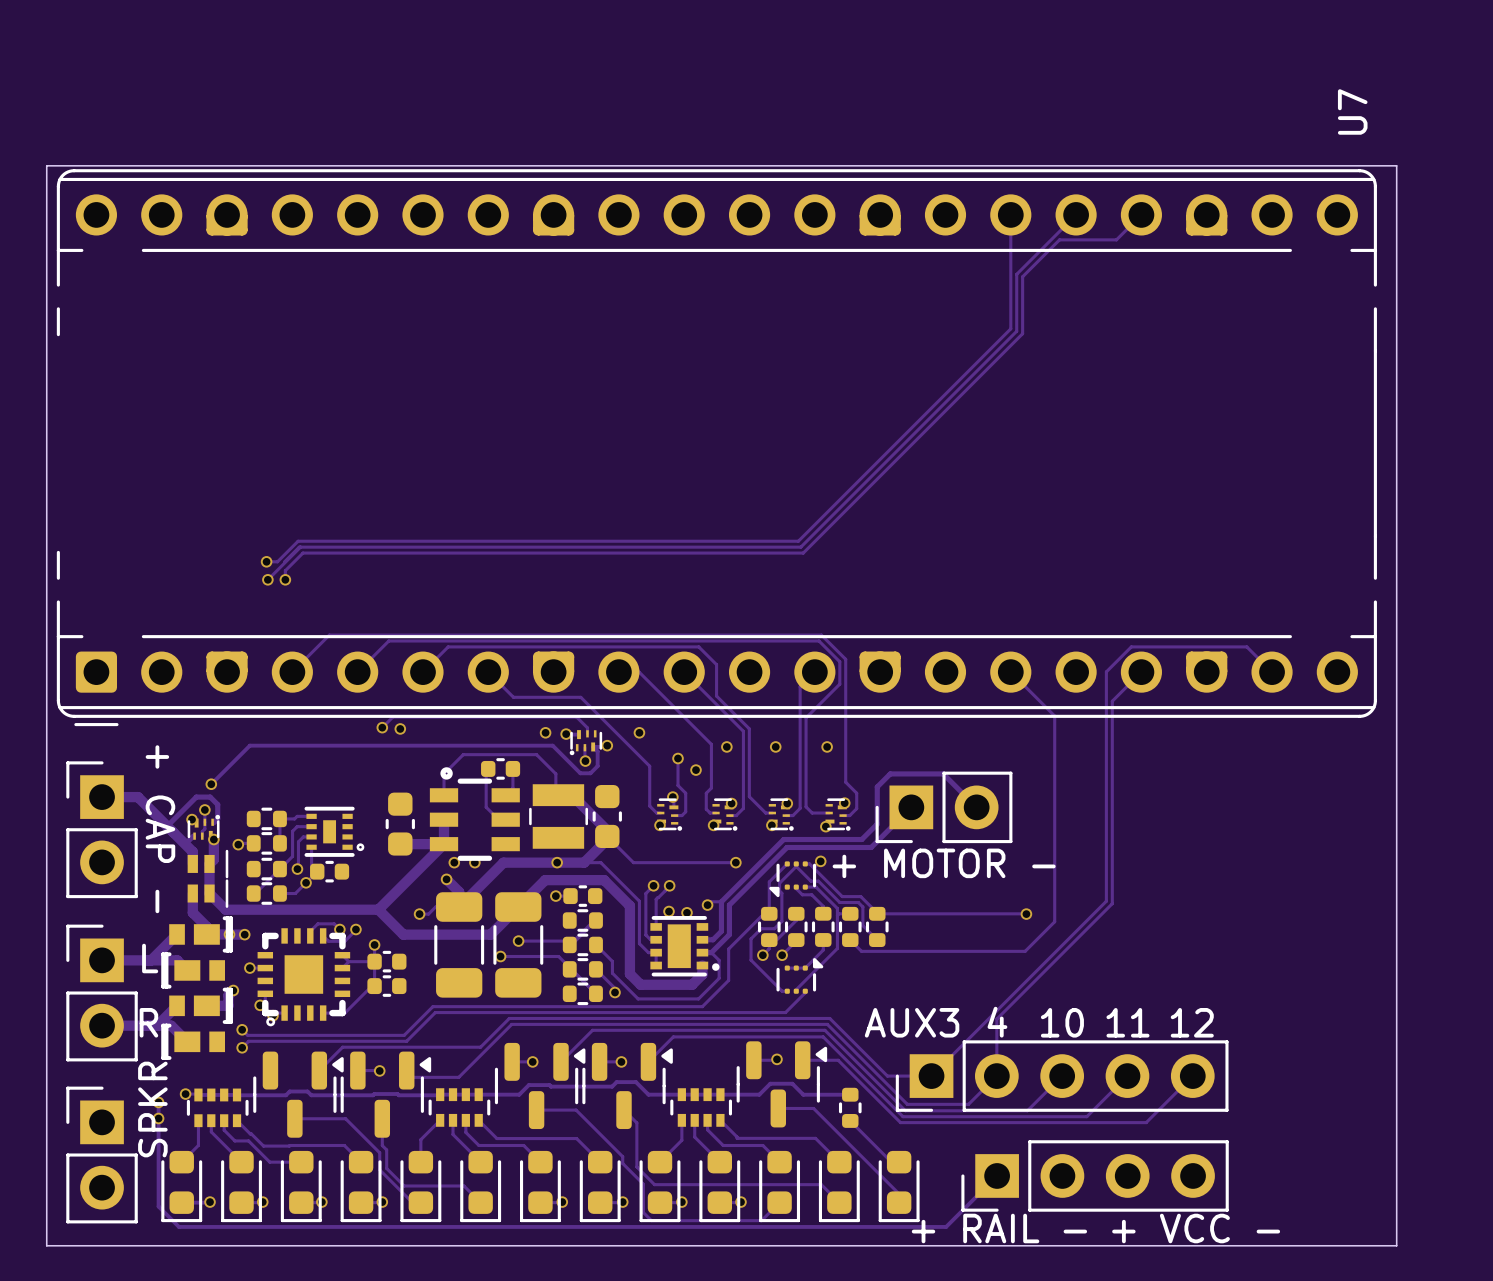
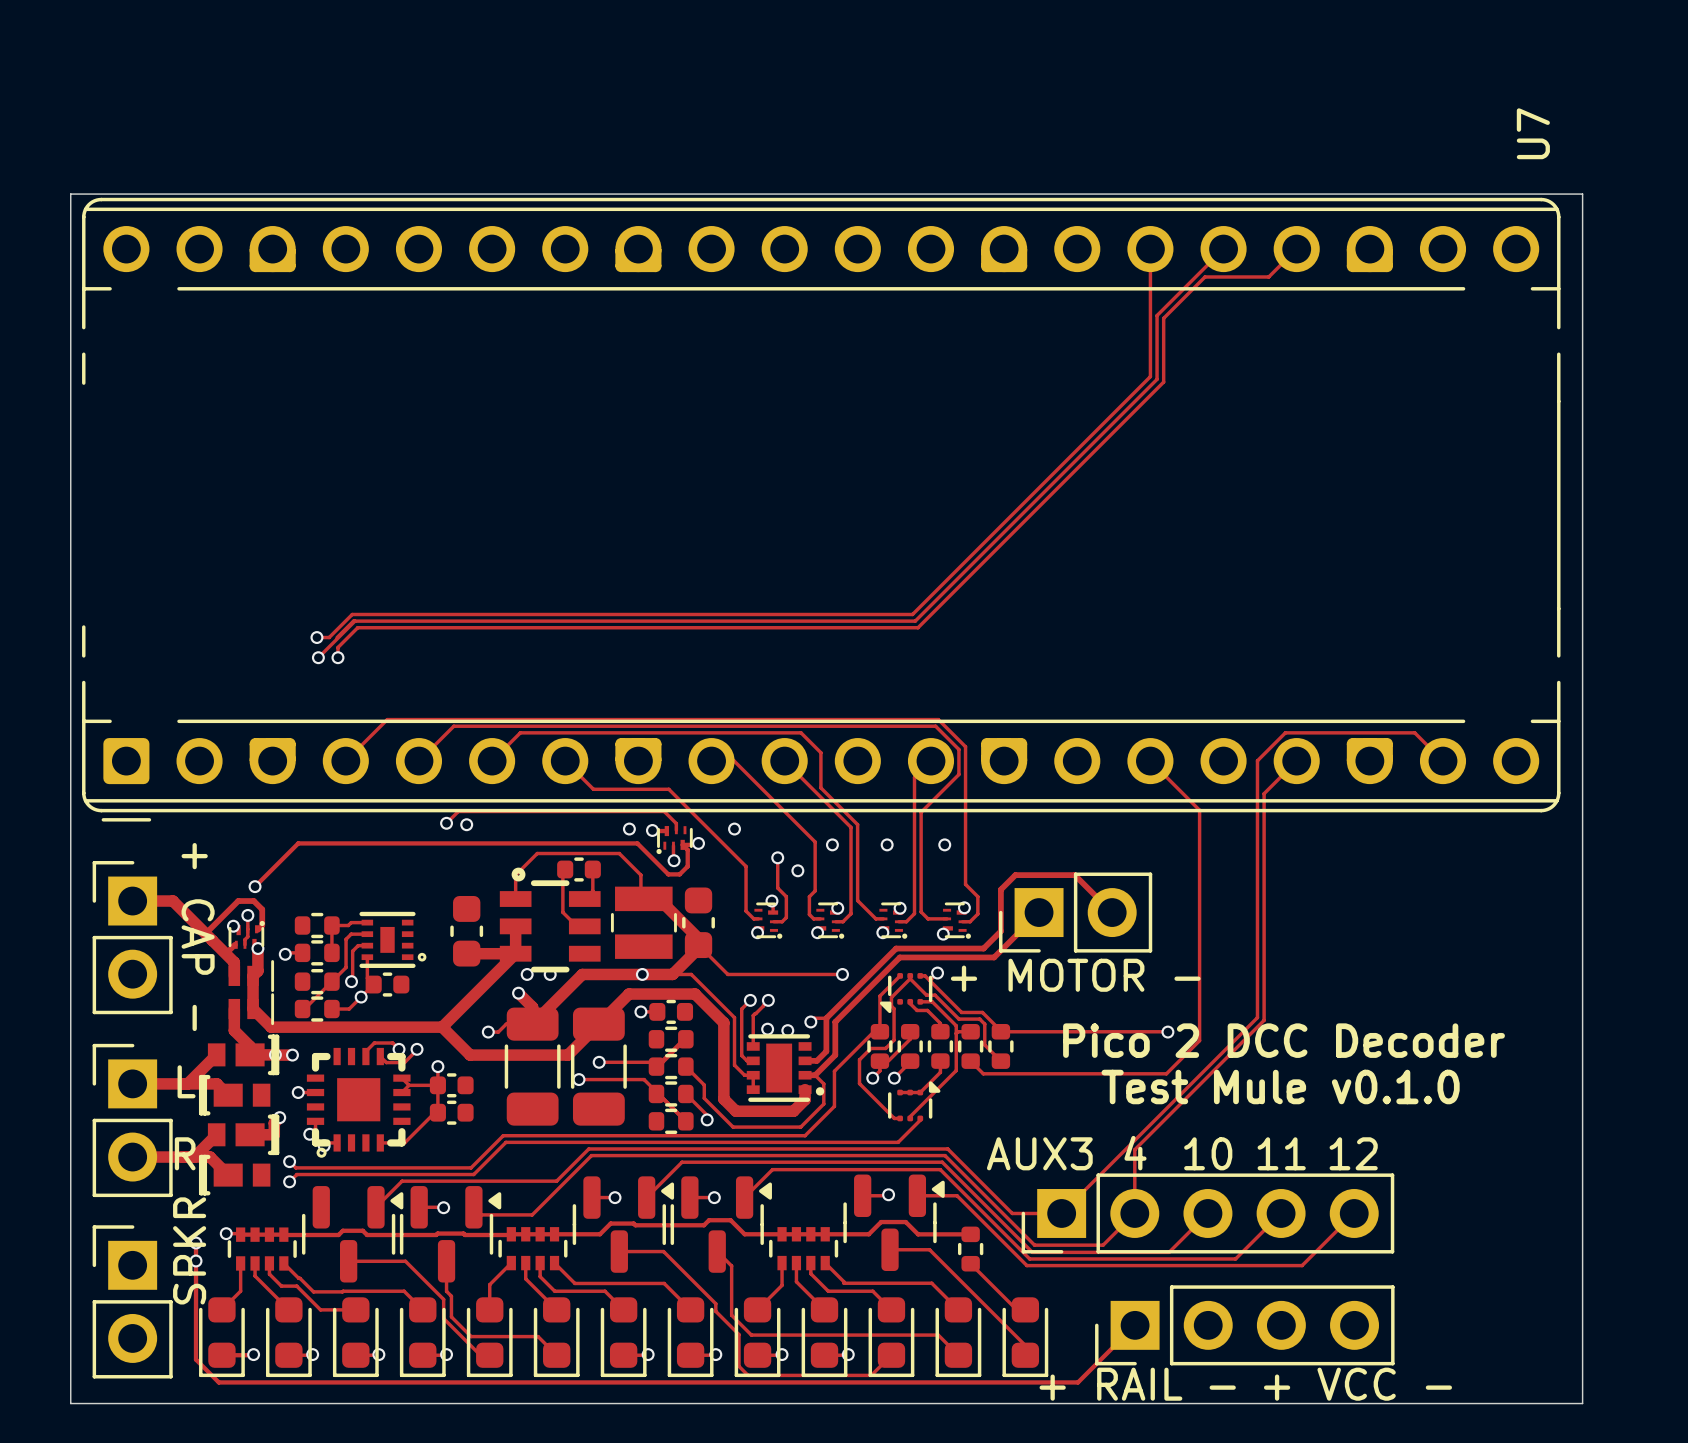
text: none -> Pico 2 DCC Decoder (1284, 1040)
text: none -> Test Mule v0.1.0 (1280, 1086)

